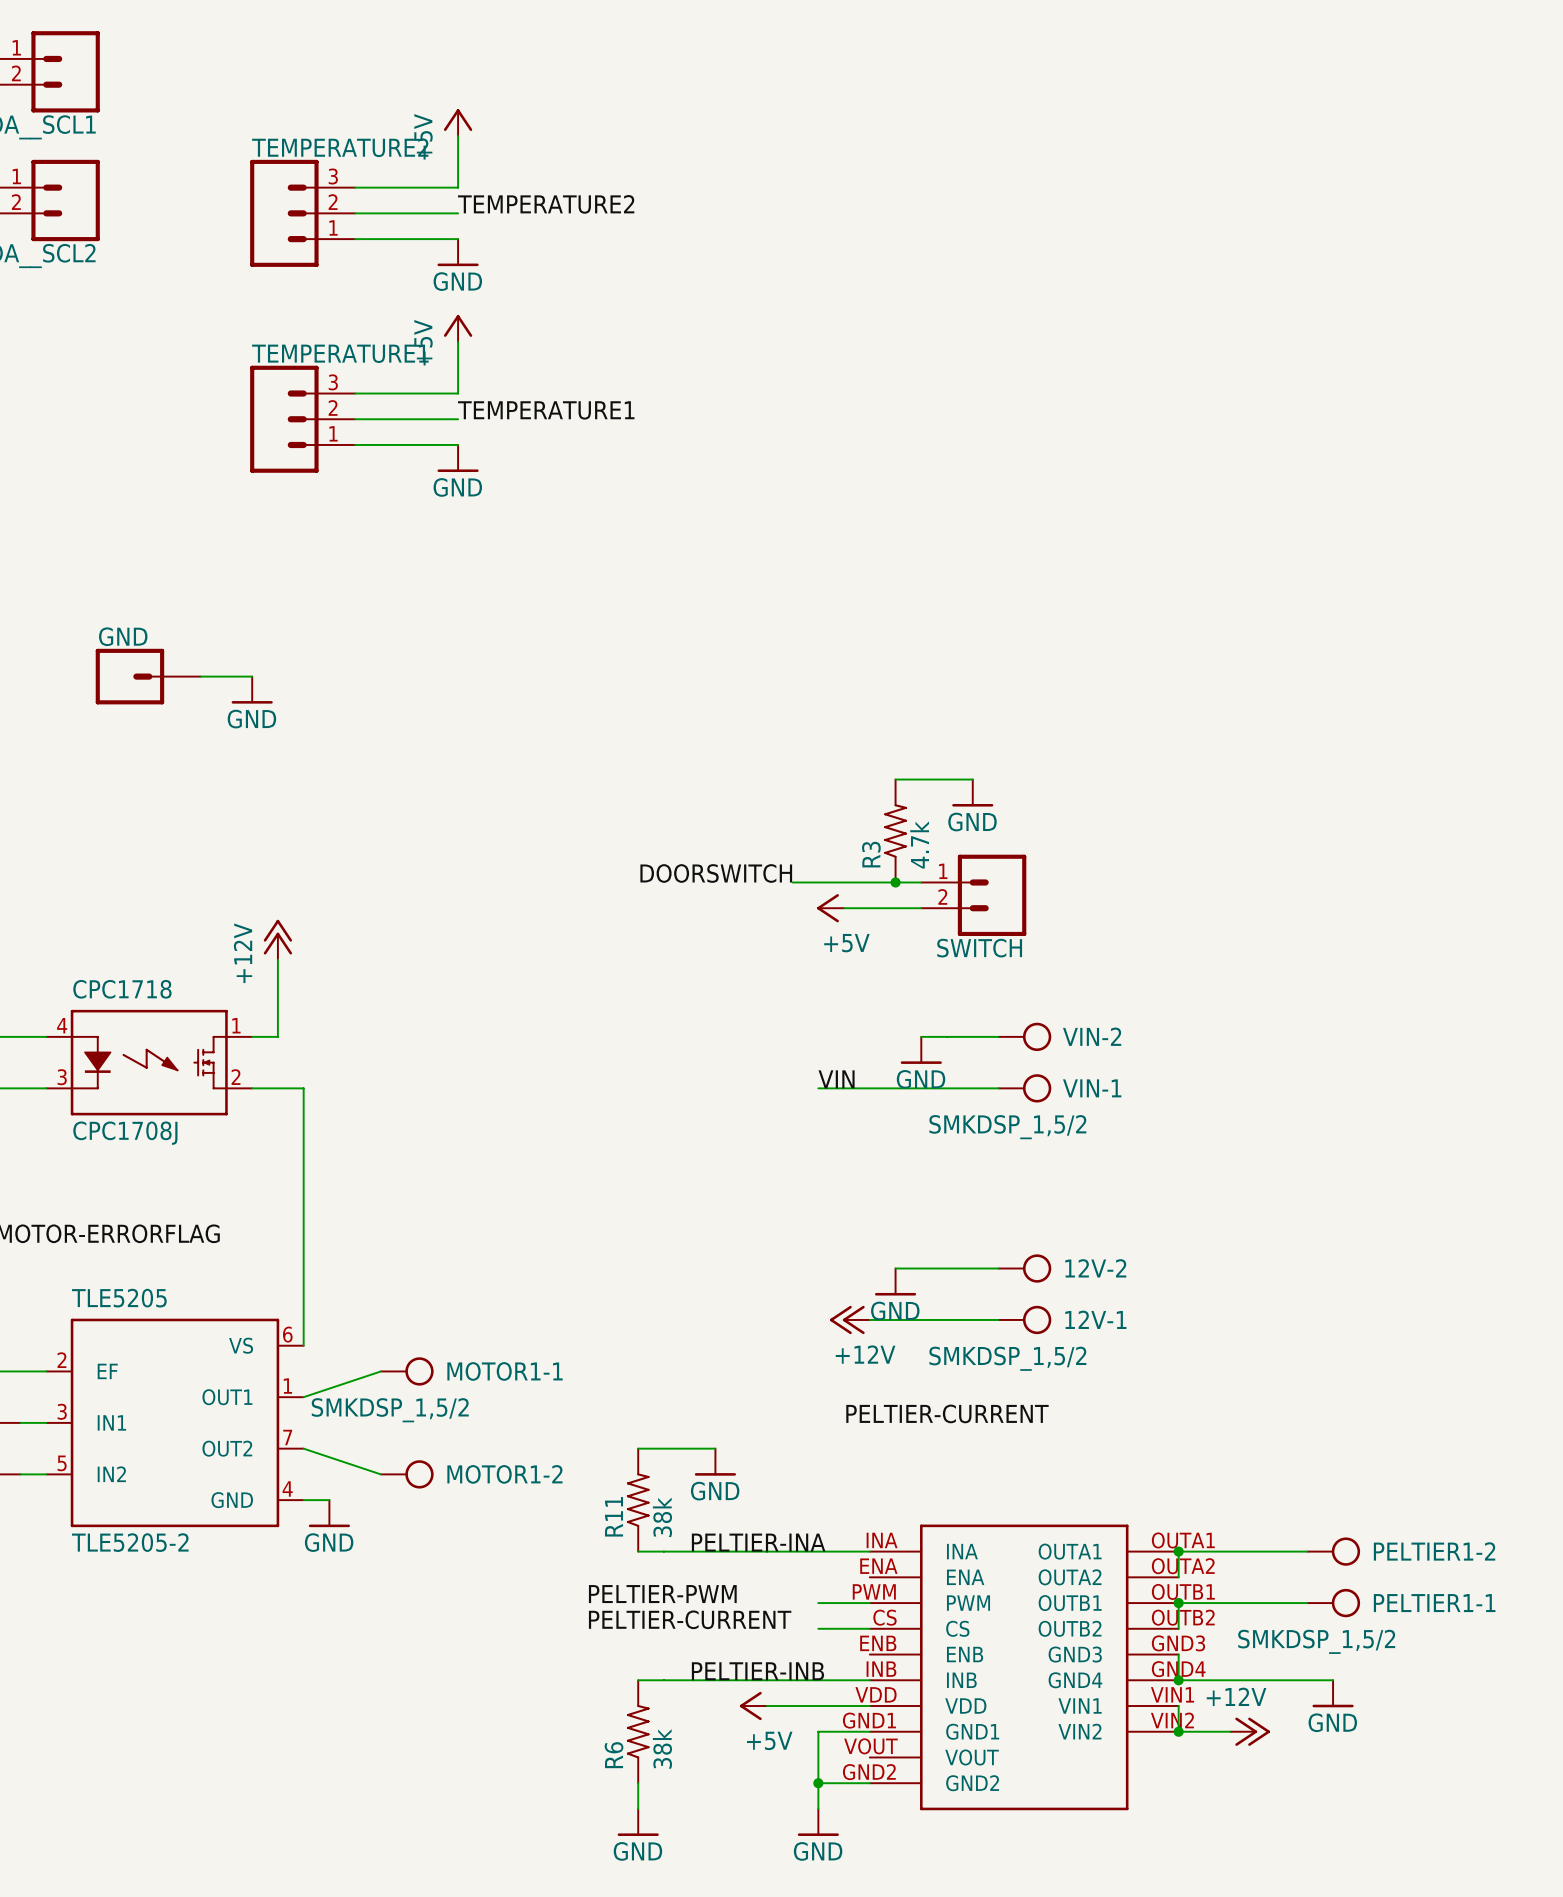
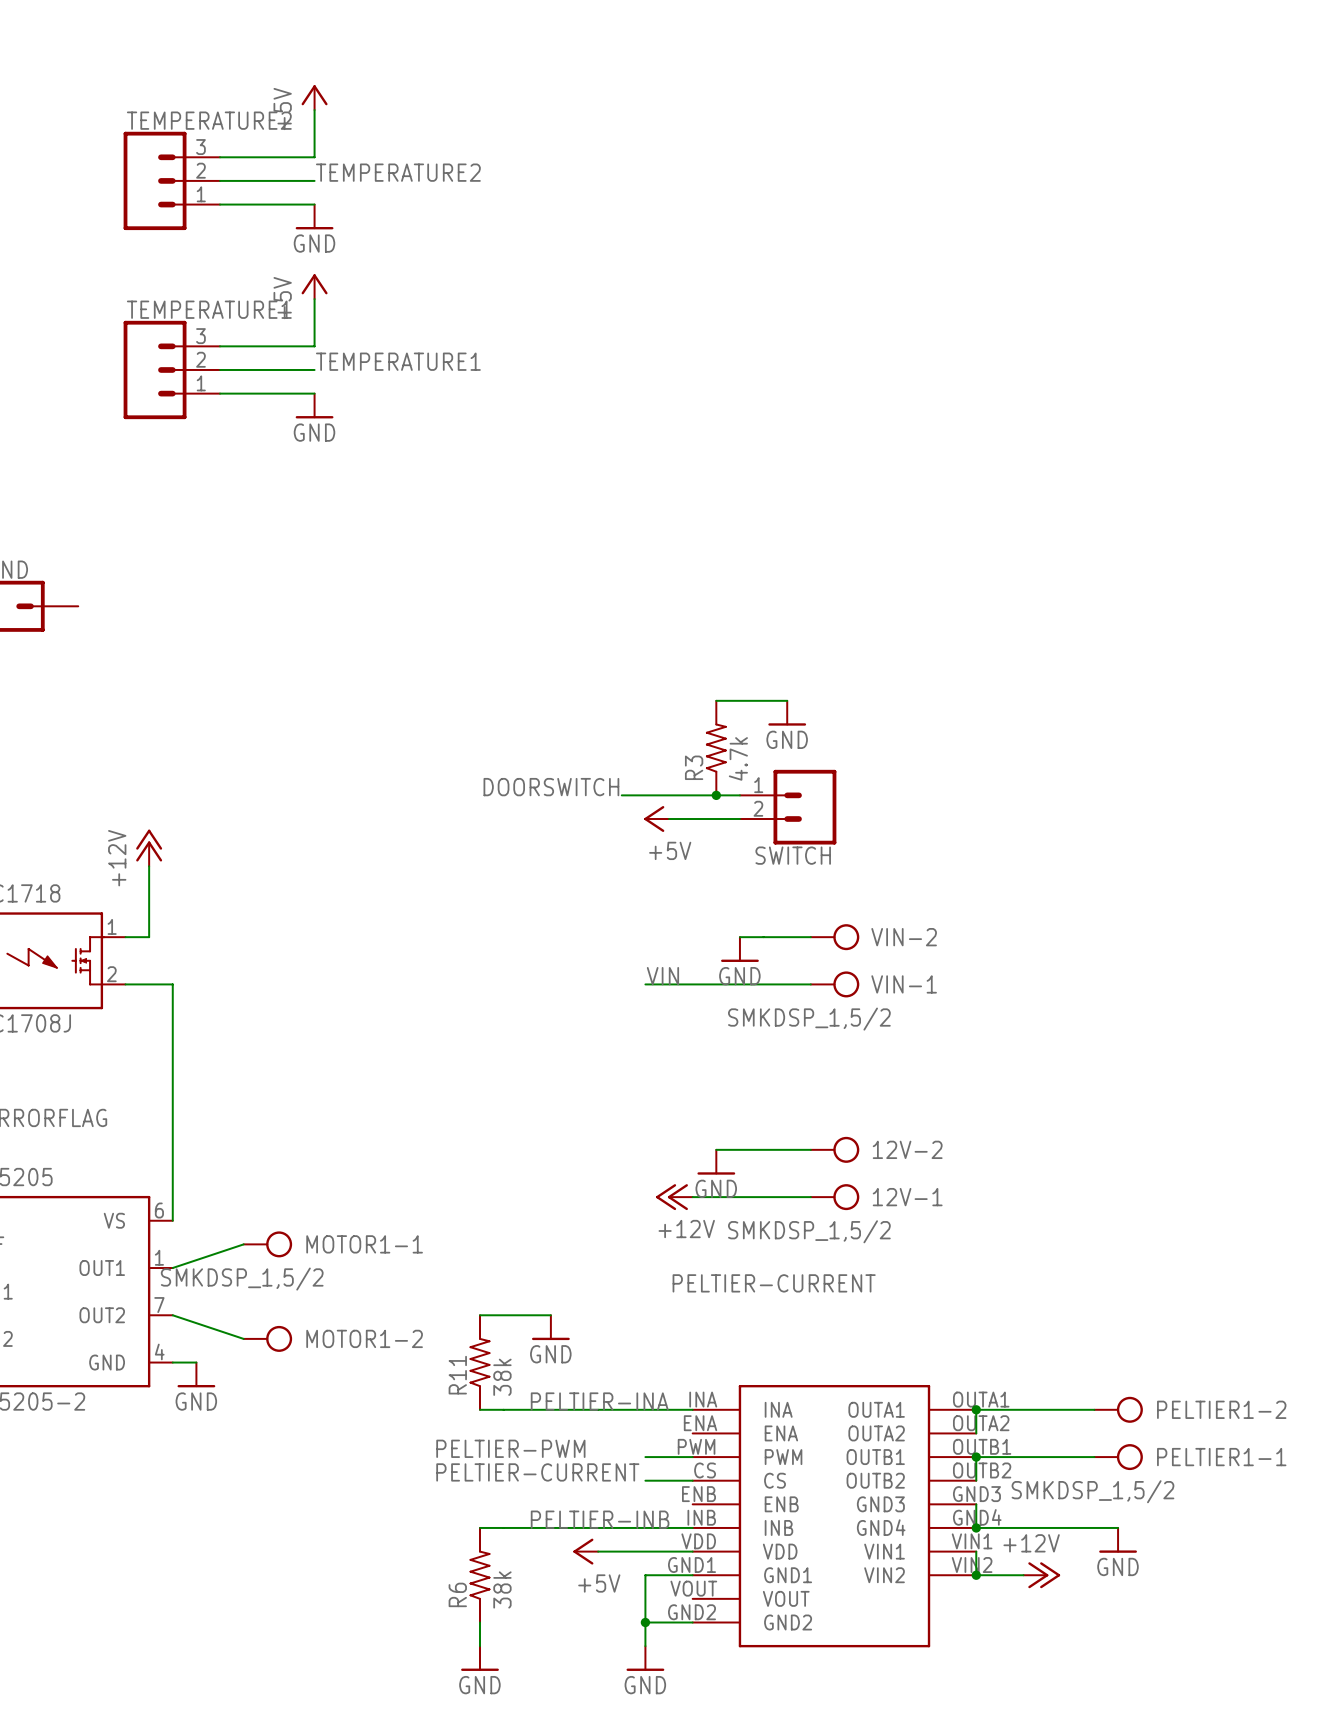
wire: (200, 676) (252, 676) -> none
power symbol: GND (252, 690) -> none

